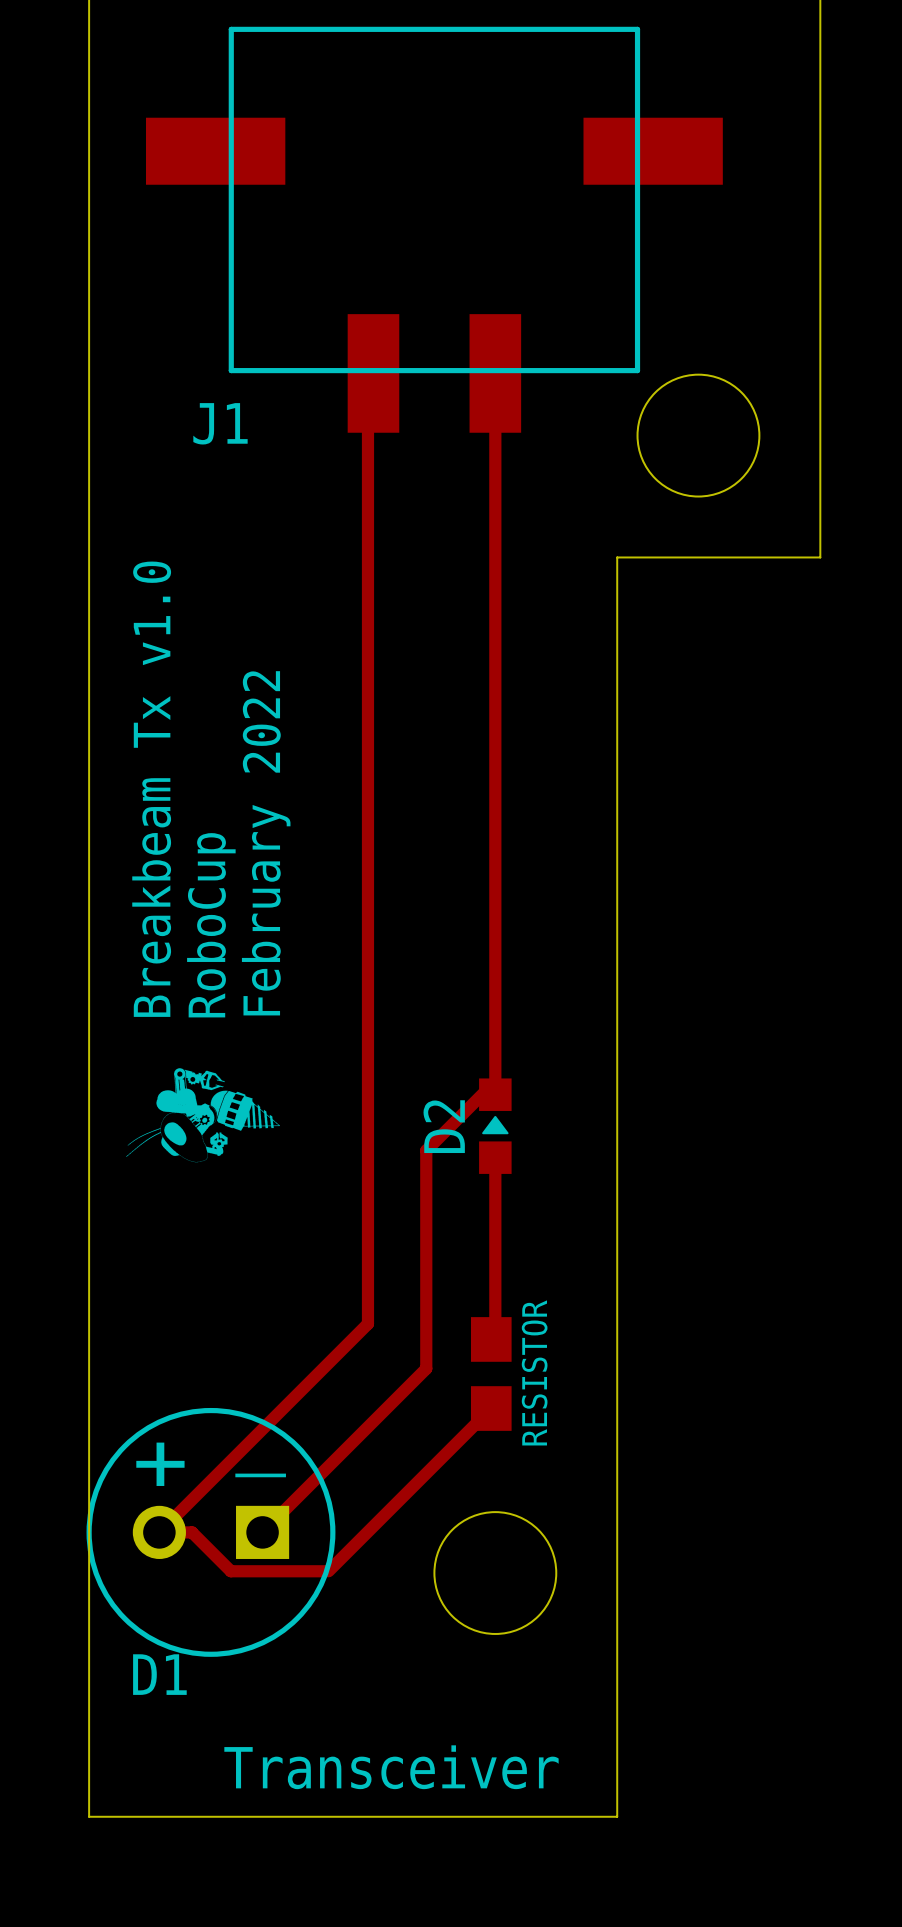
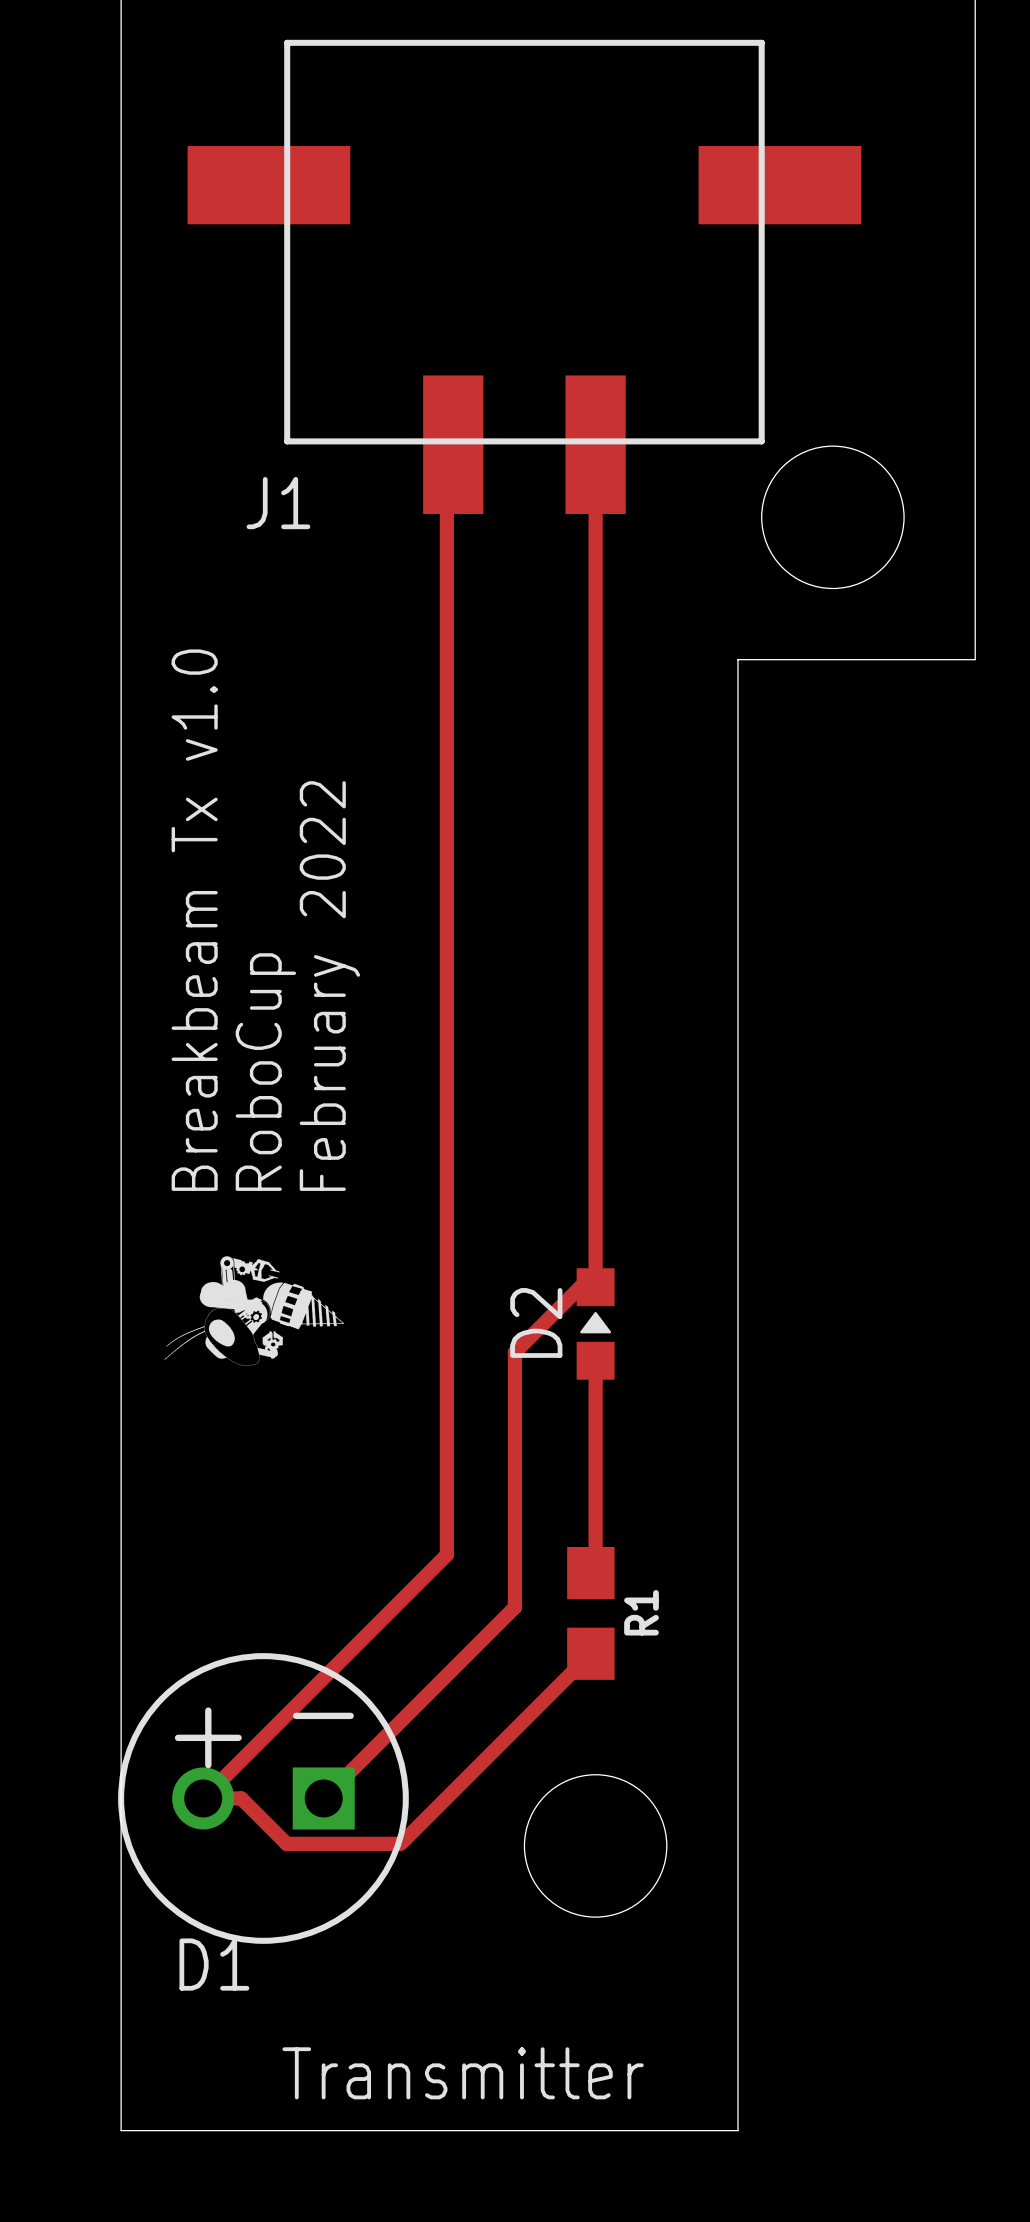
RESISTOR name: RESISTOR (534, 1372) -> R1 (641, 1612)
text: Transceiver (391, 1767) -> Transmitter (463, 2073)

